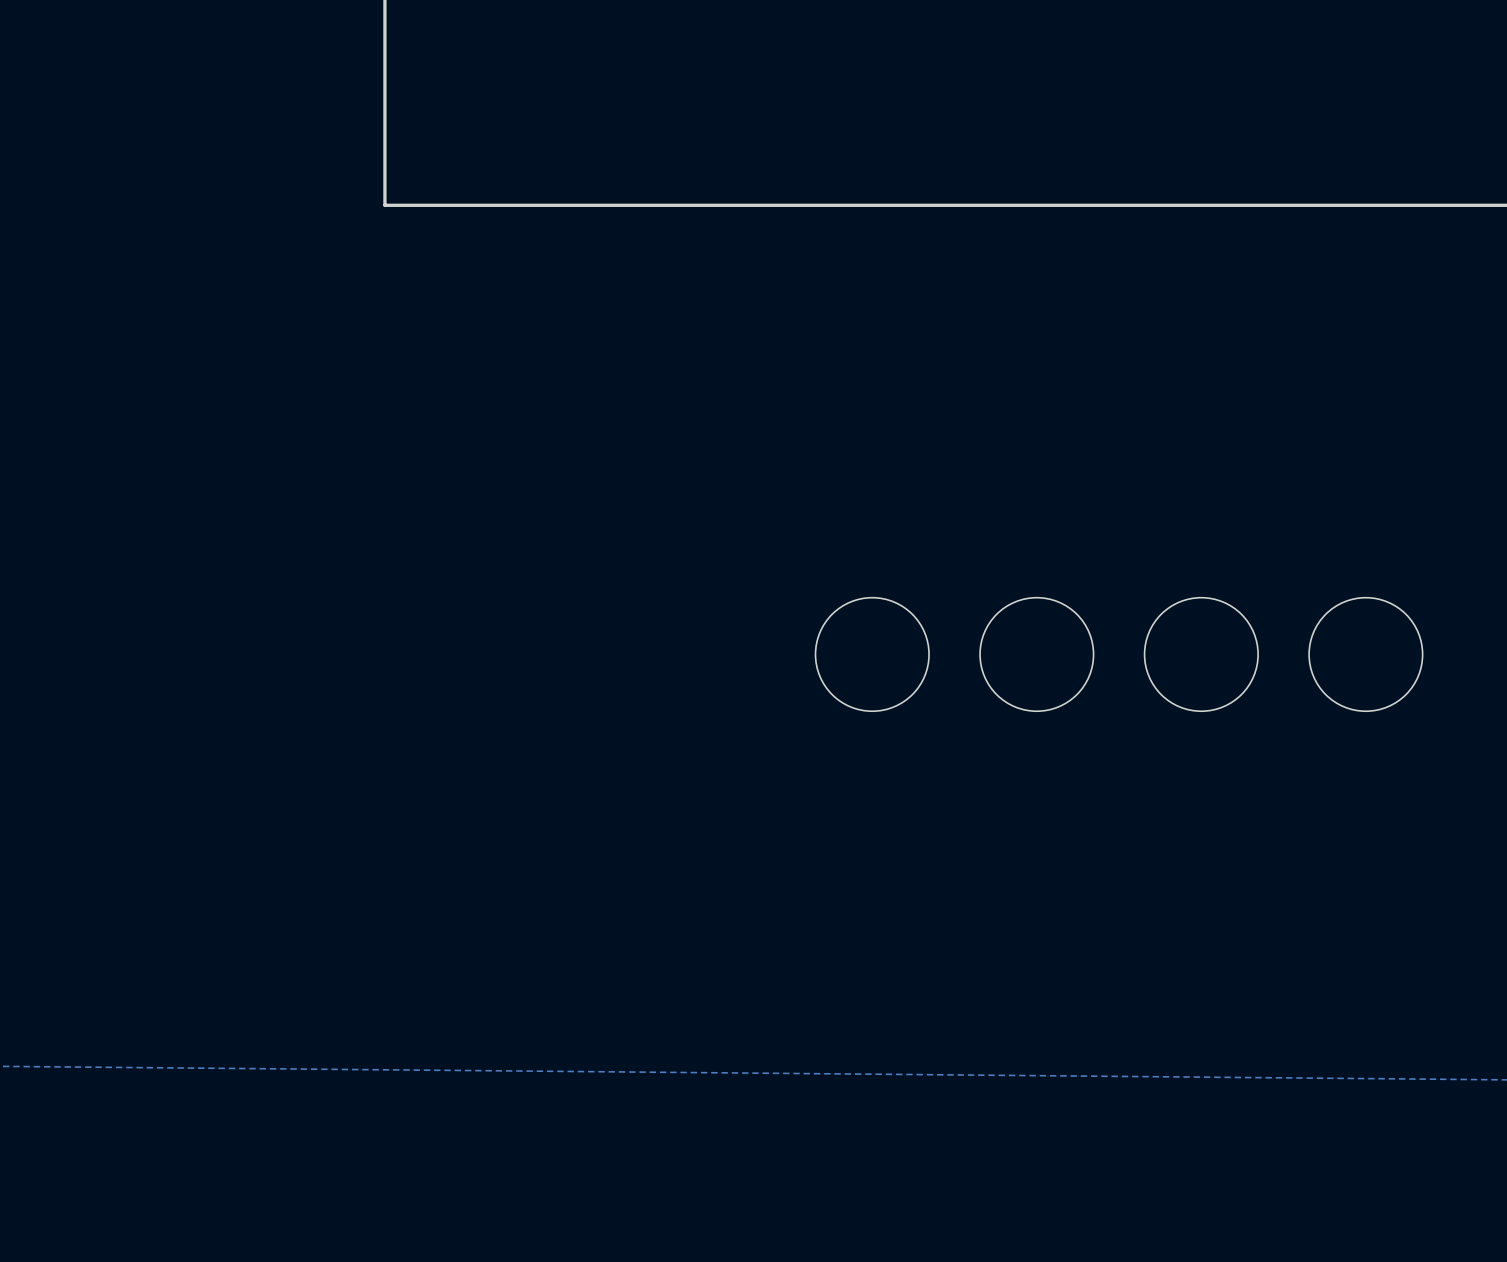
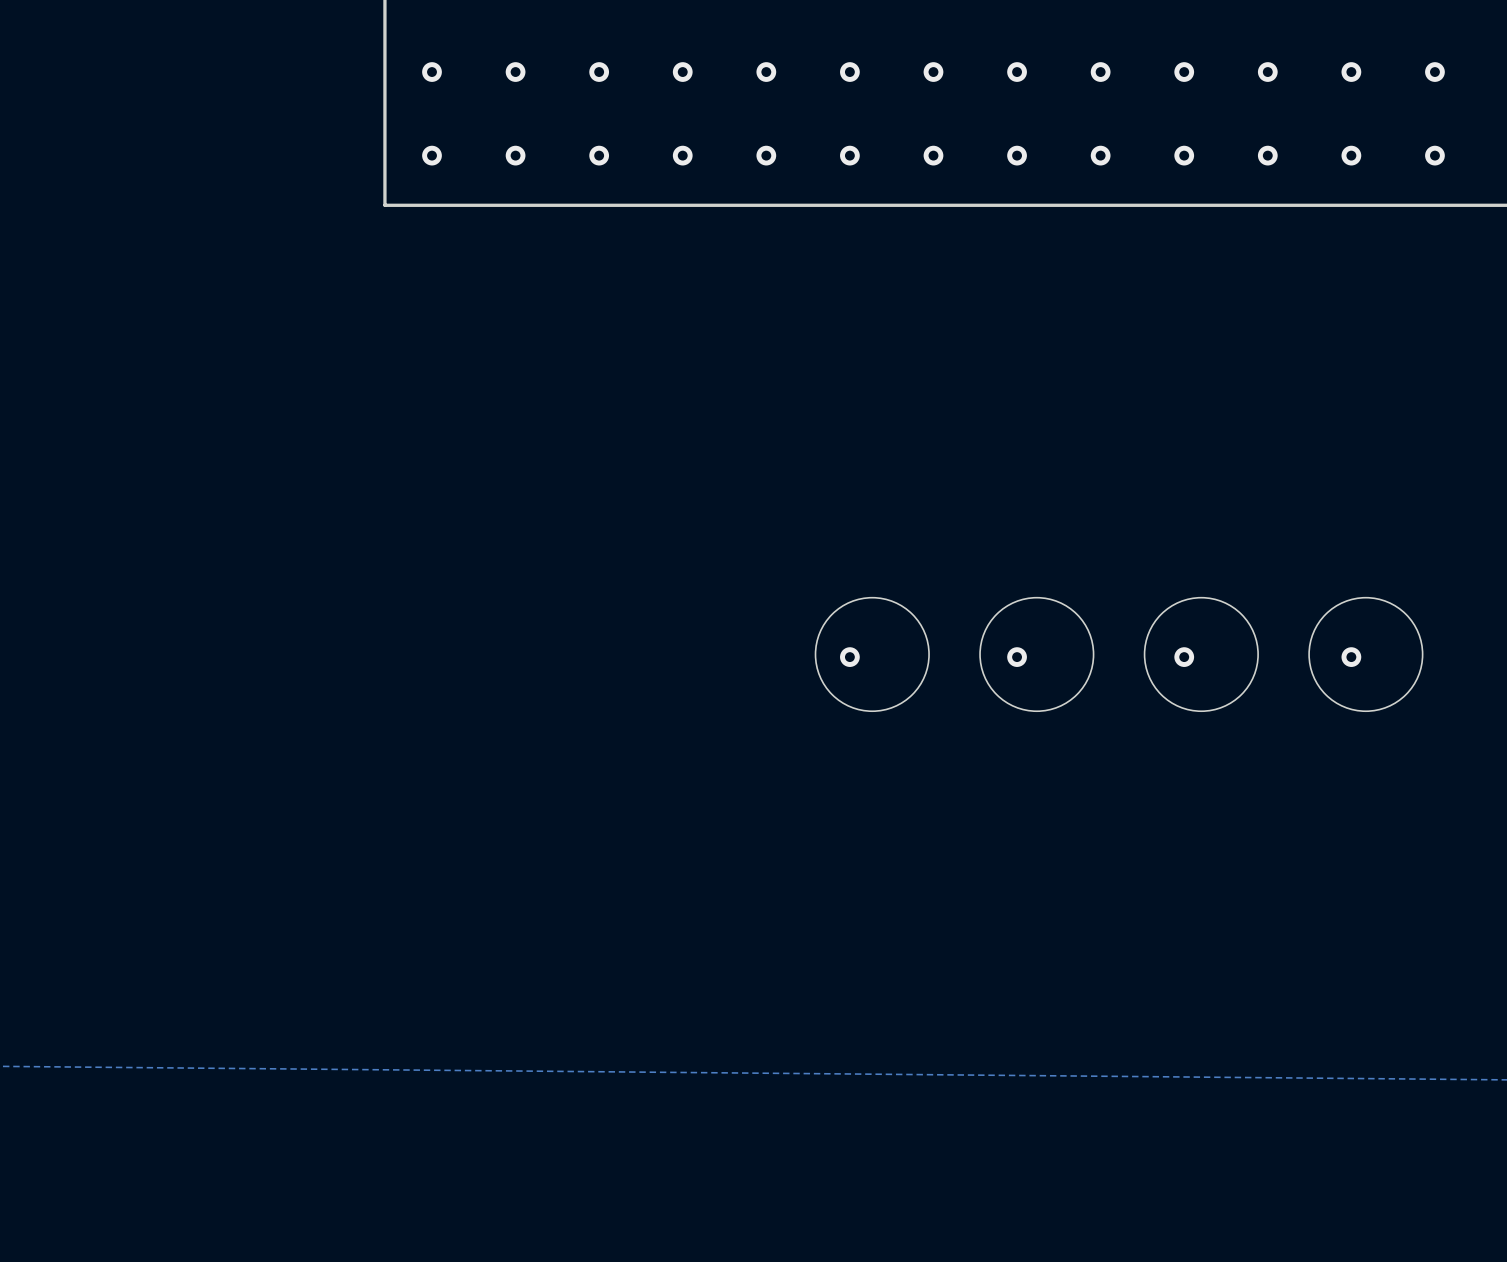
via: none -> (432, 72)
via: none -> (515, 72)
via: none -> (599, 72)
via: none -> (682, 72)
via: none -> (766, 72)
via: none -> (849, 72)
via: none -> (933, 72)
via: none -> (1017, 72)
via: none -> (1100, 72)
via: none -> (1184, 72)
via: none -> (1267, 72)
via: none -> (1351, 72)
via: none -> (1434, 72)
via: none -> (432, 155)
via: none -> (515, 155)
via: none -> (599, 155)
via: none -> (682, 155)
via: none -> (766, 155)
via: none -> (849, 155)
via: none -> (933, 155)
via: none -> (1017, 155)
via: none -> (1100, 155)
via: none -> (1184, 155)
via: none -> (1267, 155)
via: none -> (1351, 155)
via: none -> (1434, 155)
via: none -> (849, 657)
via: none -> (1017, 657)
via: none -> (1184, 657)
via: none -> (1351, 657)

